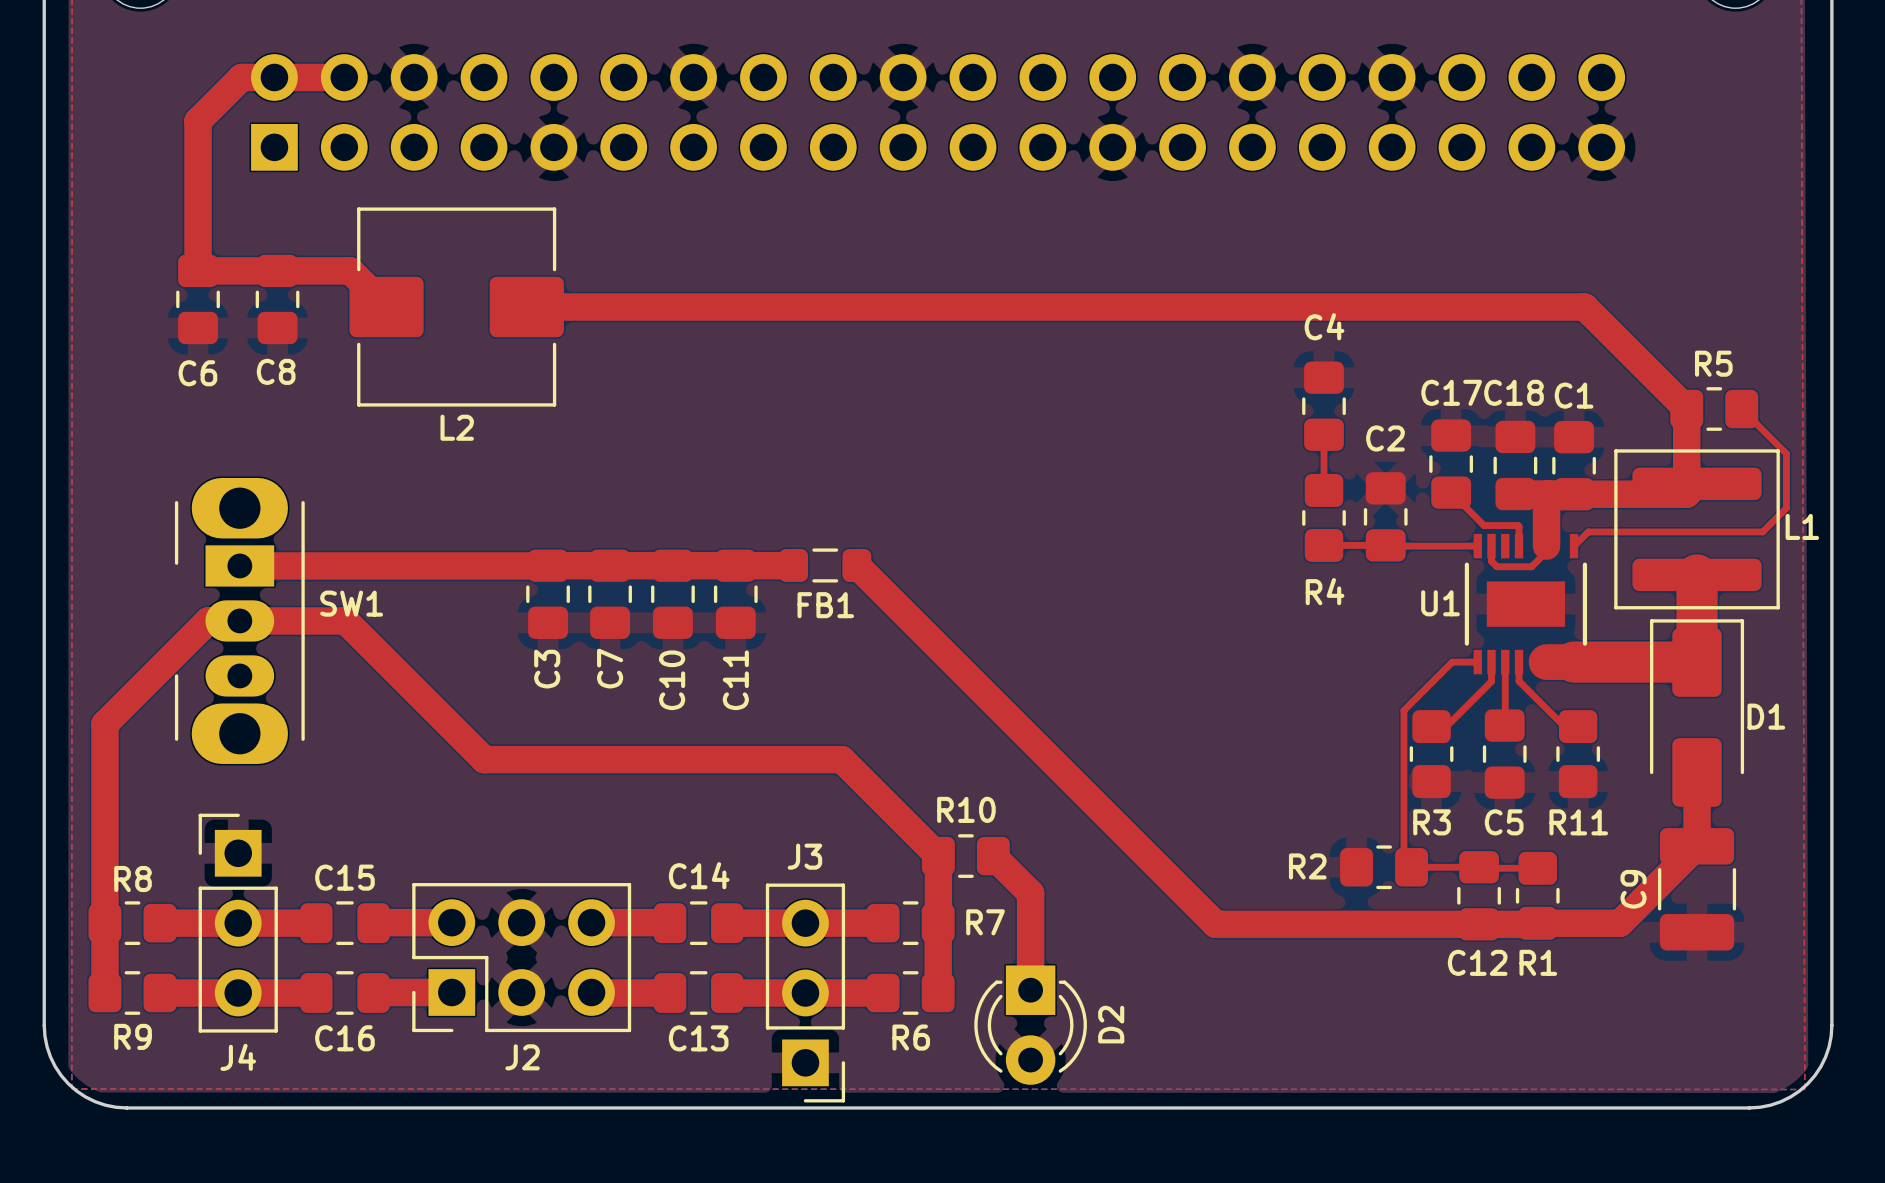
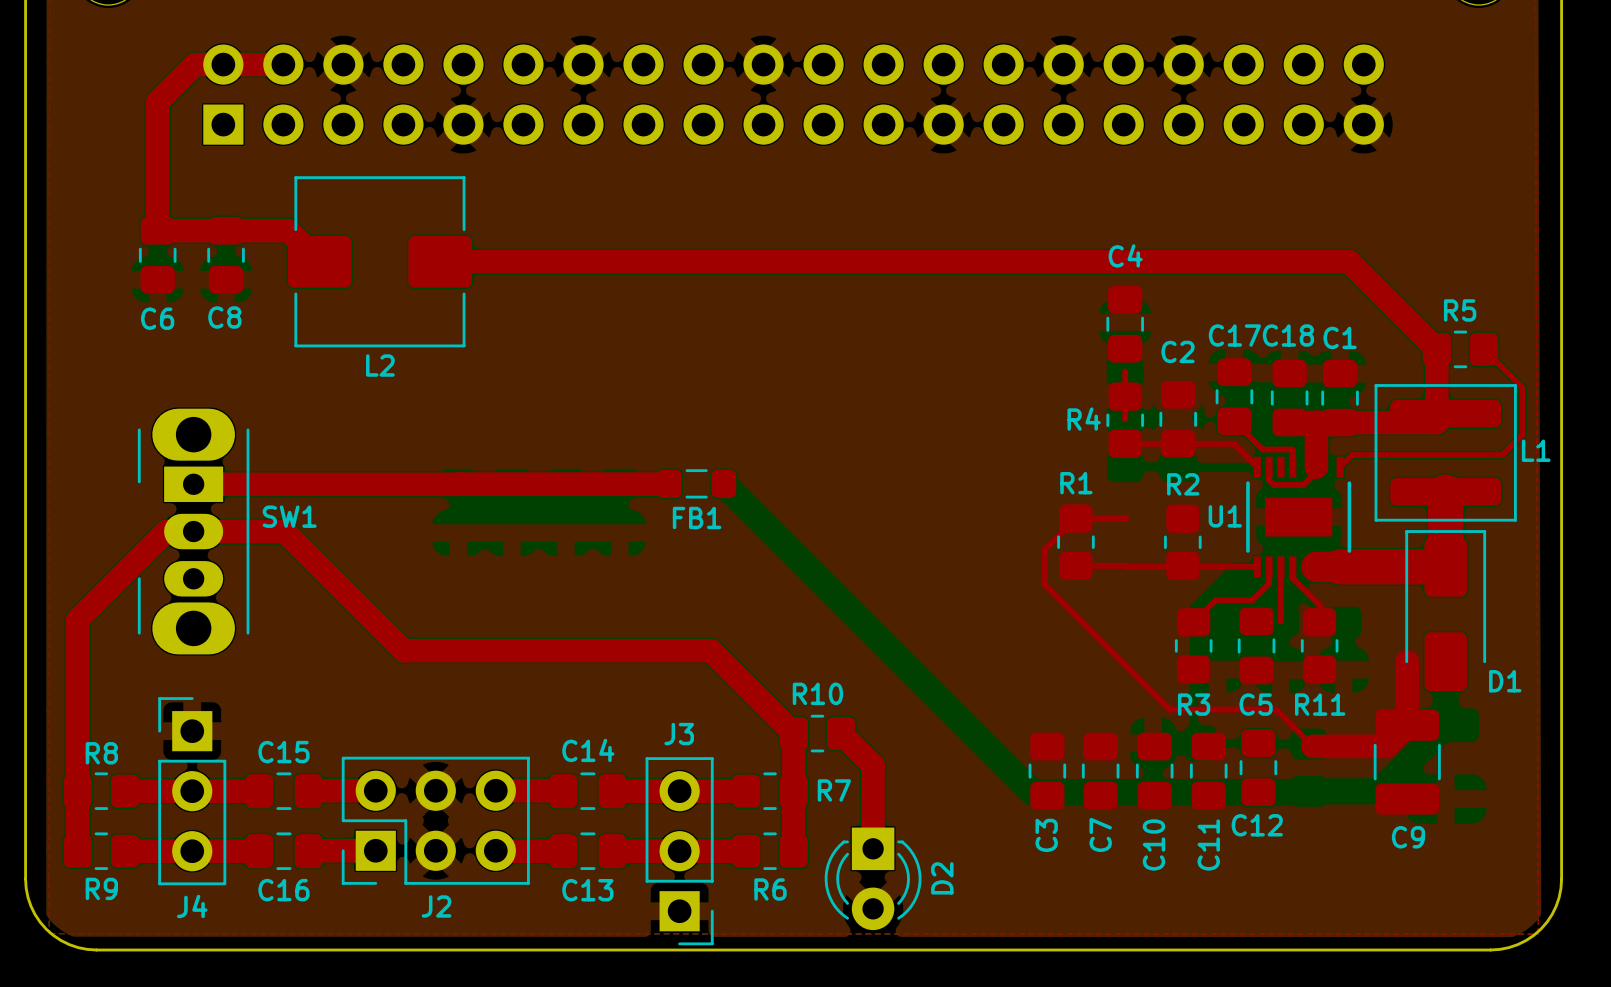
C4 position: (1324, 406) -> (1125, 324)
C2 position: (1385, 516) -> (1178, 419)
R4 position: (1324, 517) -> (1125, 420)
top track: (1324, 545) (1477, 546) -> (1125, 443) (1233, 443) (1257, 467)
top track: (856, 565) (1215, 924) (1620, 923) (1697, 846) (1697, 772) -> none
R4 name position: R4 (1325, 591) -> R4 (1084, 419)
C3 position: (548, 594) -> (1047, 771)
C7 position: (610, 594) -> (1100, 771)
C10 position: (672, 594) -> (1154, 771)
C11 position: (735, 594) -> (1208, 771)
top track: none -> (1126, 517) (1075, 518) (1044, 549) (1044, 584) (1169, 709) (1275, 709) (1312, 746) (1386, 746) (1407, 725) (1407, 661)
top track: (1452, 662) (1403, 710) (1403, 859) (1411, 867) (1537, 868) -> (1235, 566) (1075, 565)
top track: (1519, 662) (1519, 681) (1564, 726) (1578, 726) -> none
top track: none -> (1291, 577) (1319, 605) (1319, 622)
top track: (1472, 701) (1446, 726) (1431, 726) -> (1252, 600) (1215, 600) (1193, 622)
D1 name position: D1 (1766, 716) -> D1 (1505, 681)
R3 position: (1431, 754) -> (1193, 645)
C5 position: (1504, 754) -> (1256, 645)
R11 position: (1578, 754) -> (1319, 645)
R2 rotation: 0° (1384, 867) -> 90° clockwise (1182, 542)
R2 position: (1384, 867) -> (1182, 542)
C9 name rotation: 0° (1633, 889) -> 90° clockwise (1408, 837)
C9 name position: C9 (1633, 889) -> C9 (1408, 837)
C9 position: (1697, 889) -> (1407, 762)
R1 position: (1537, 895) -> (1075, 542)
R1 name position: R1 (1538, 962) -> R1 (1076, 483)

